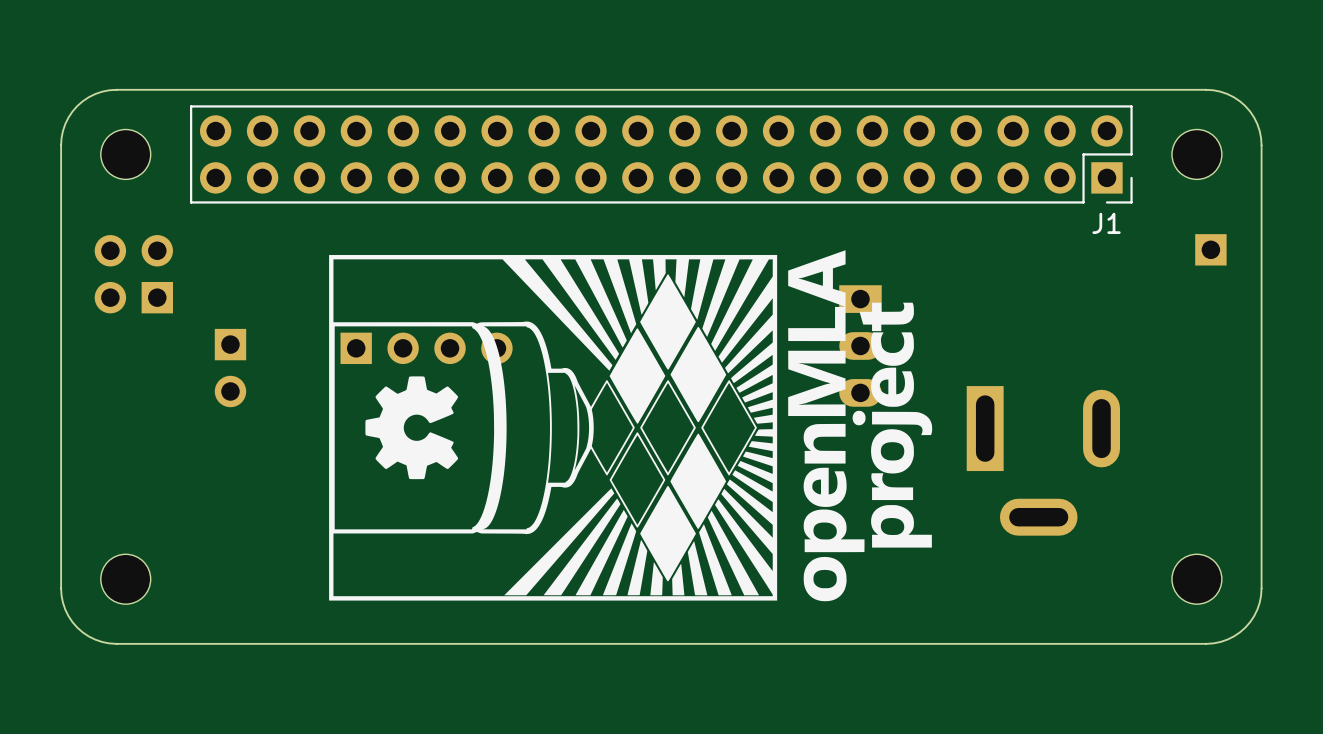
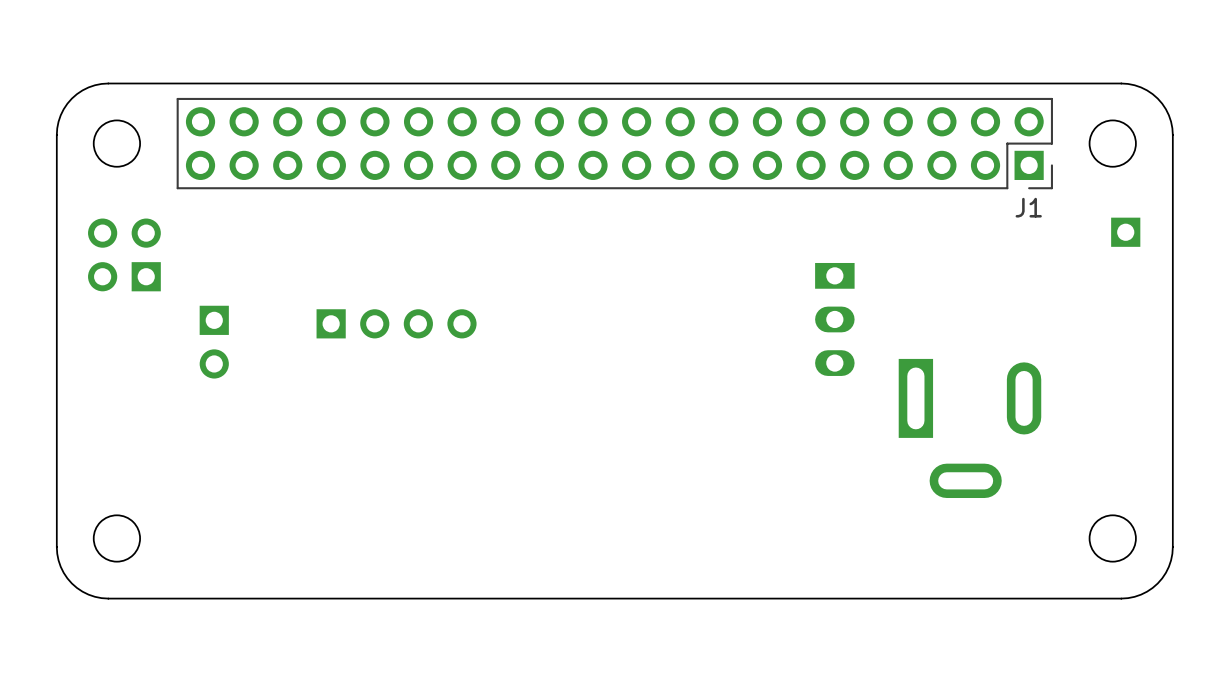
drawing: [329, 250, 933, 602] -> none
part position: (860, 345) -> (834, 319)

